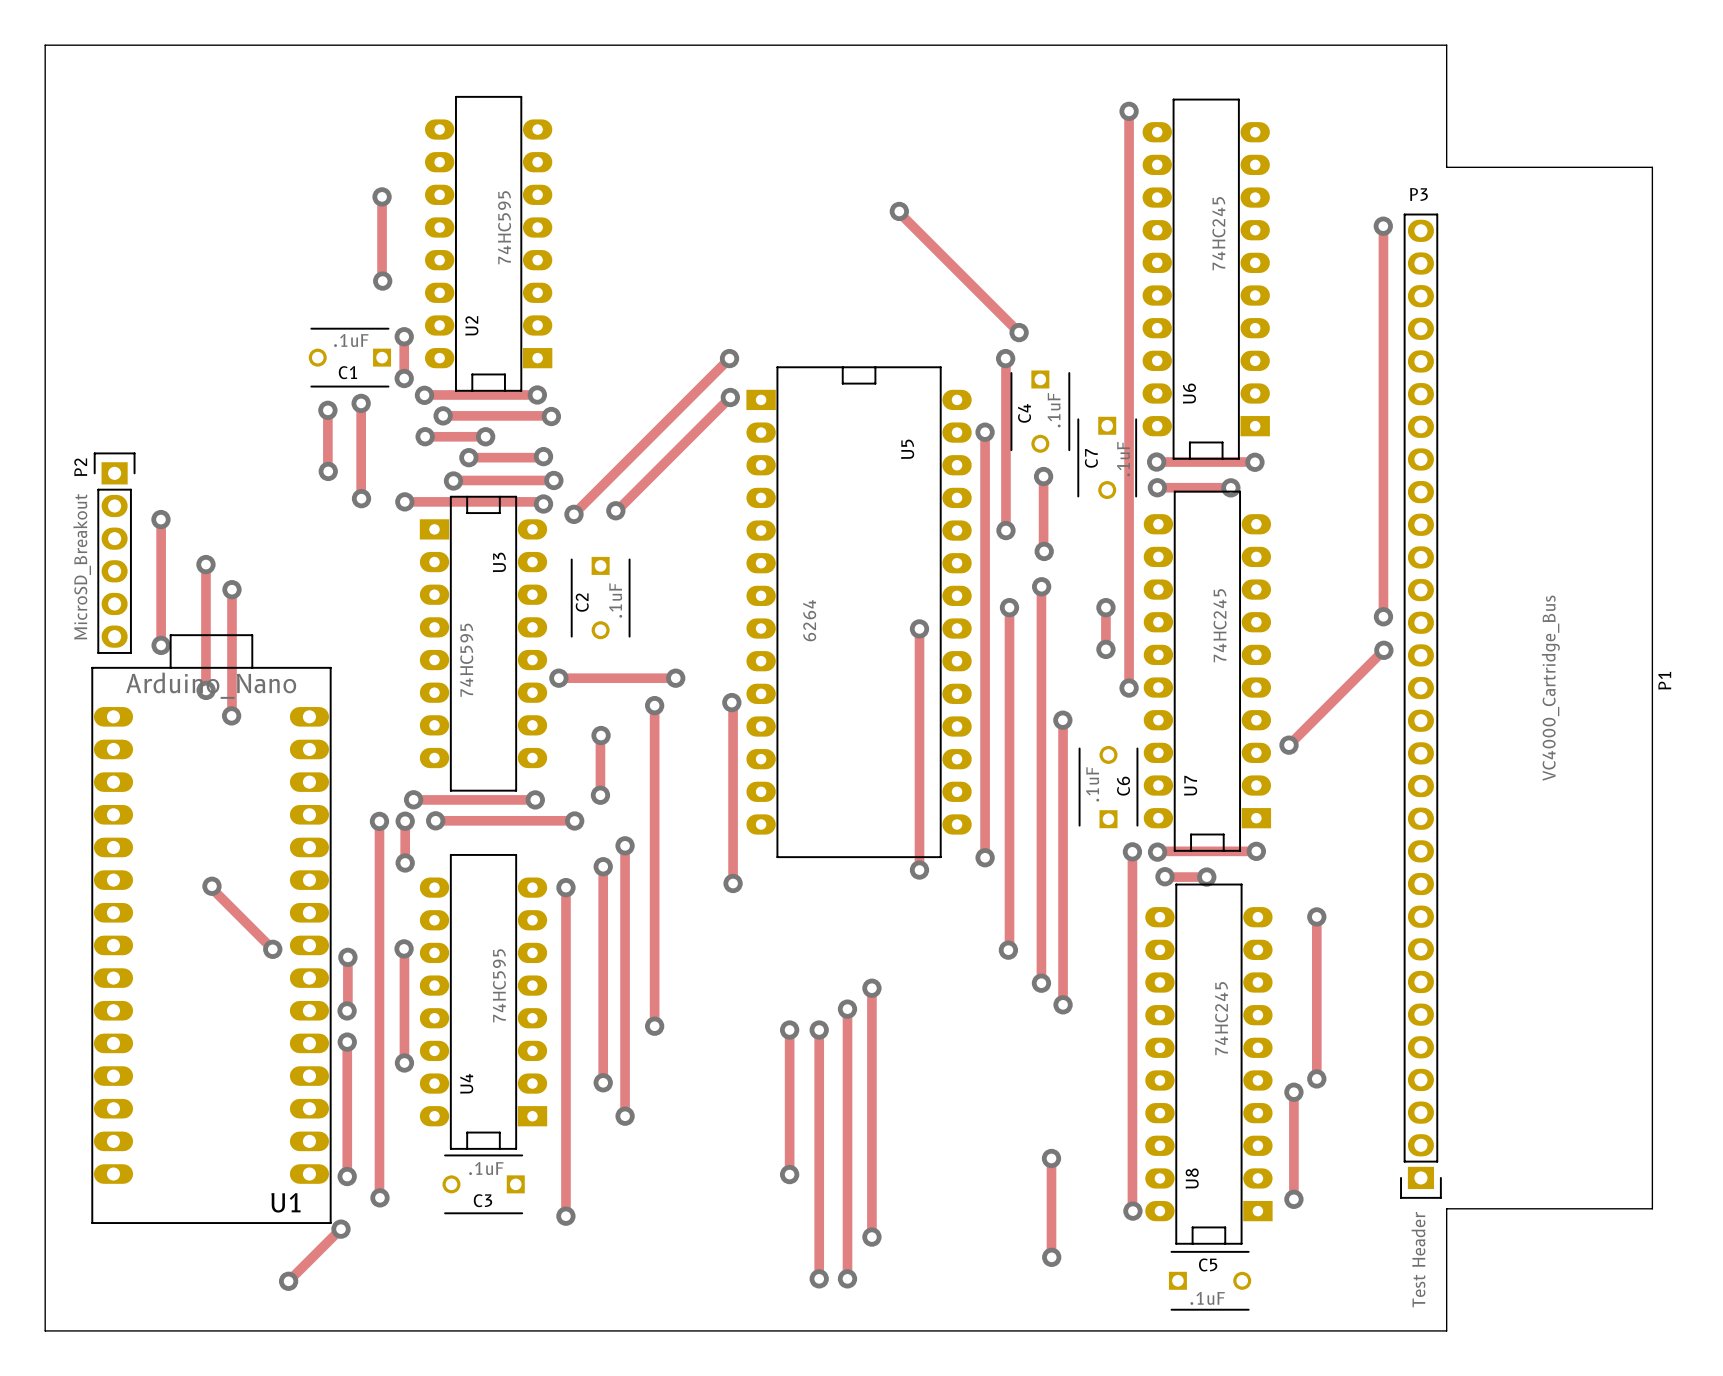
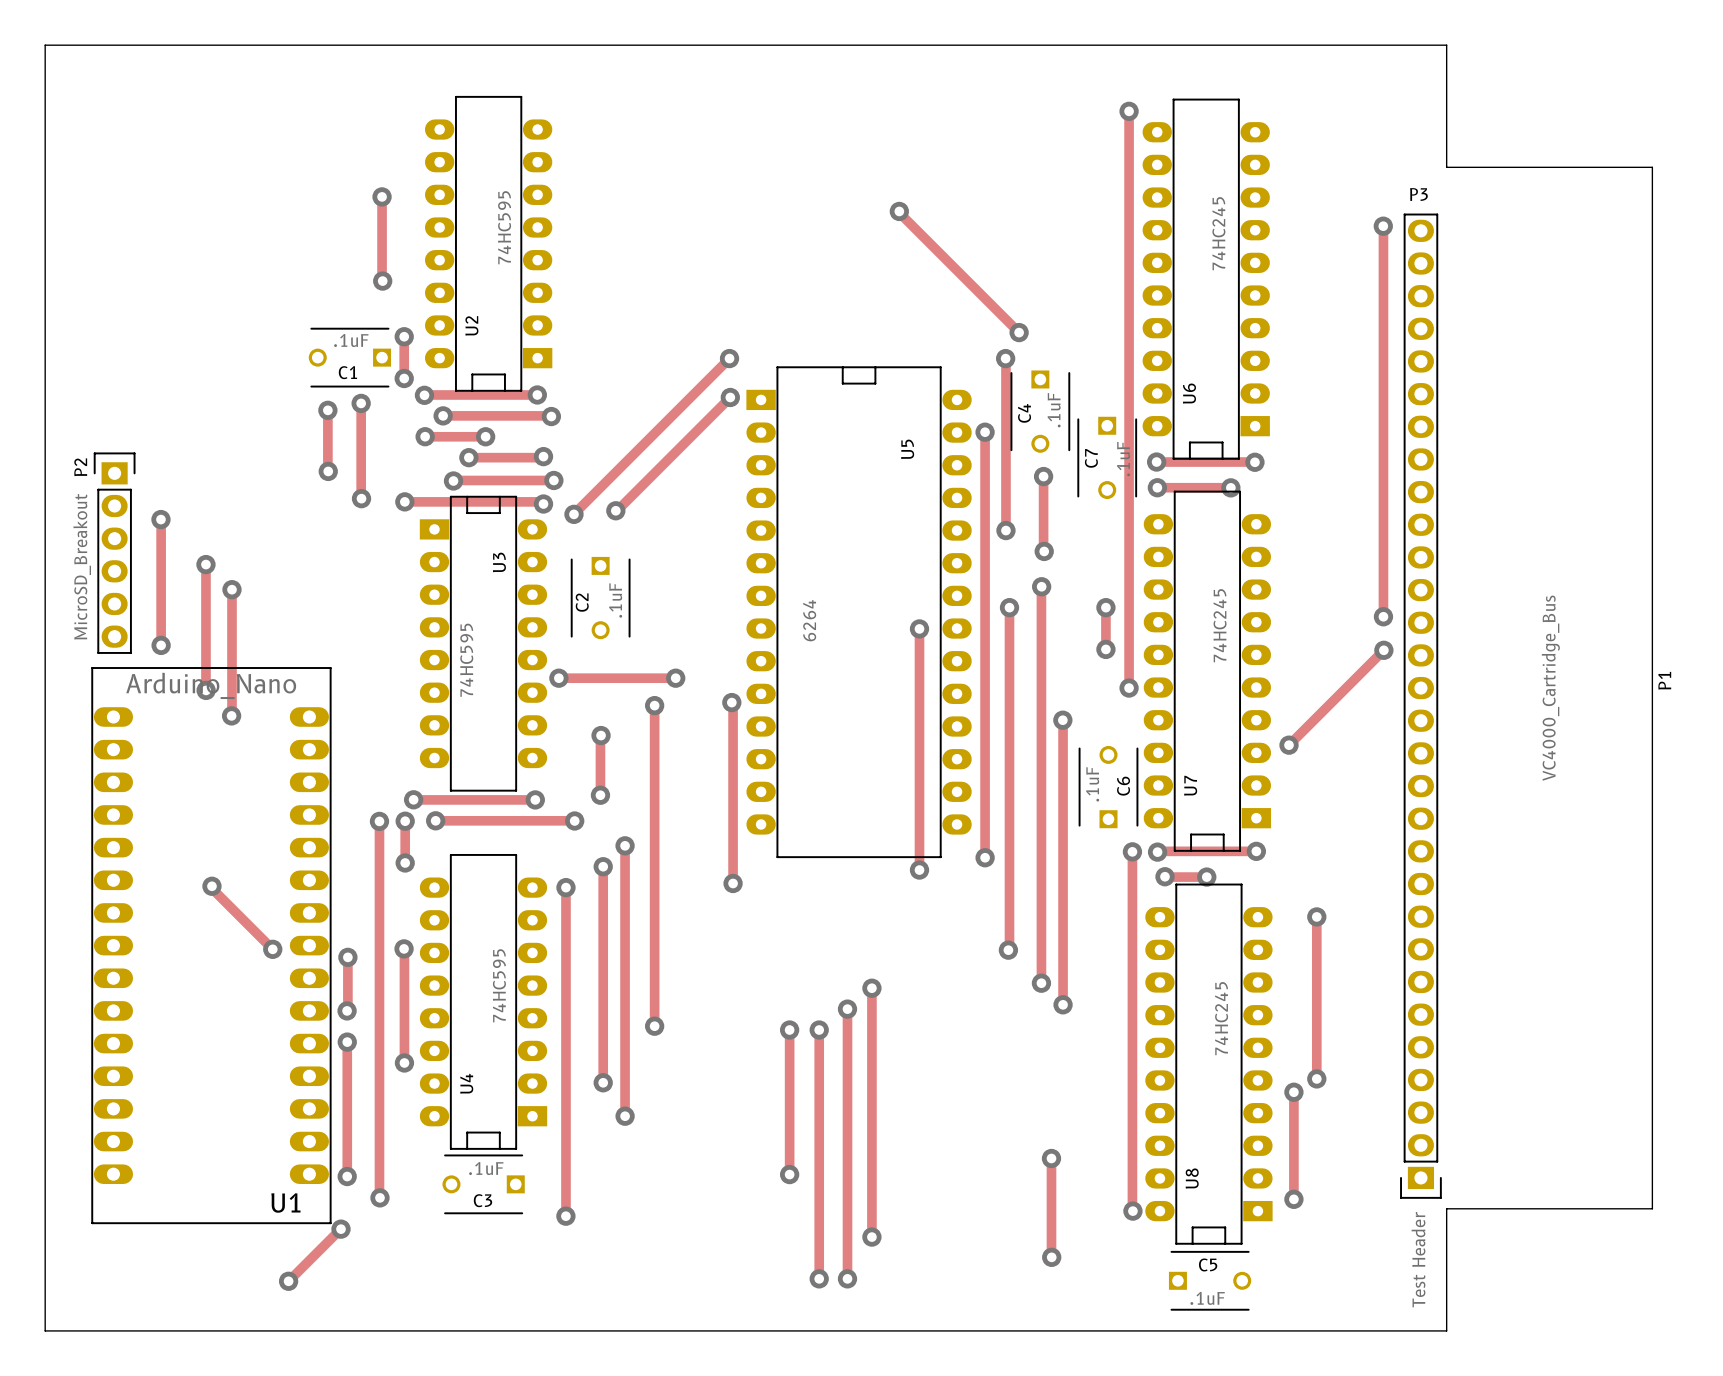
U1 footprint: [91, 634, 332, 1224] -> [91, 667, 332, 1225]

